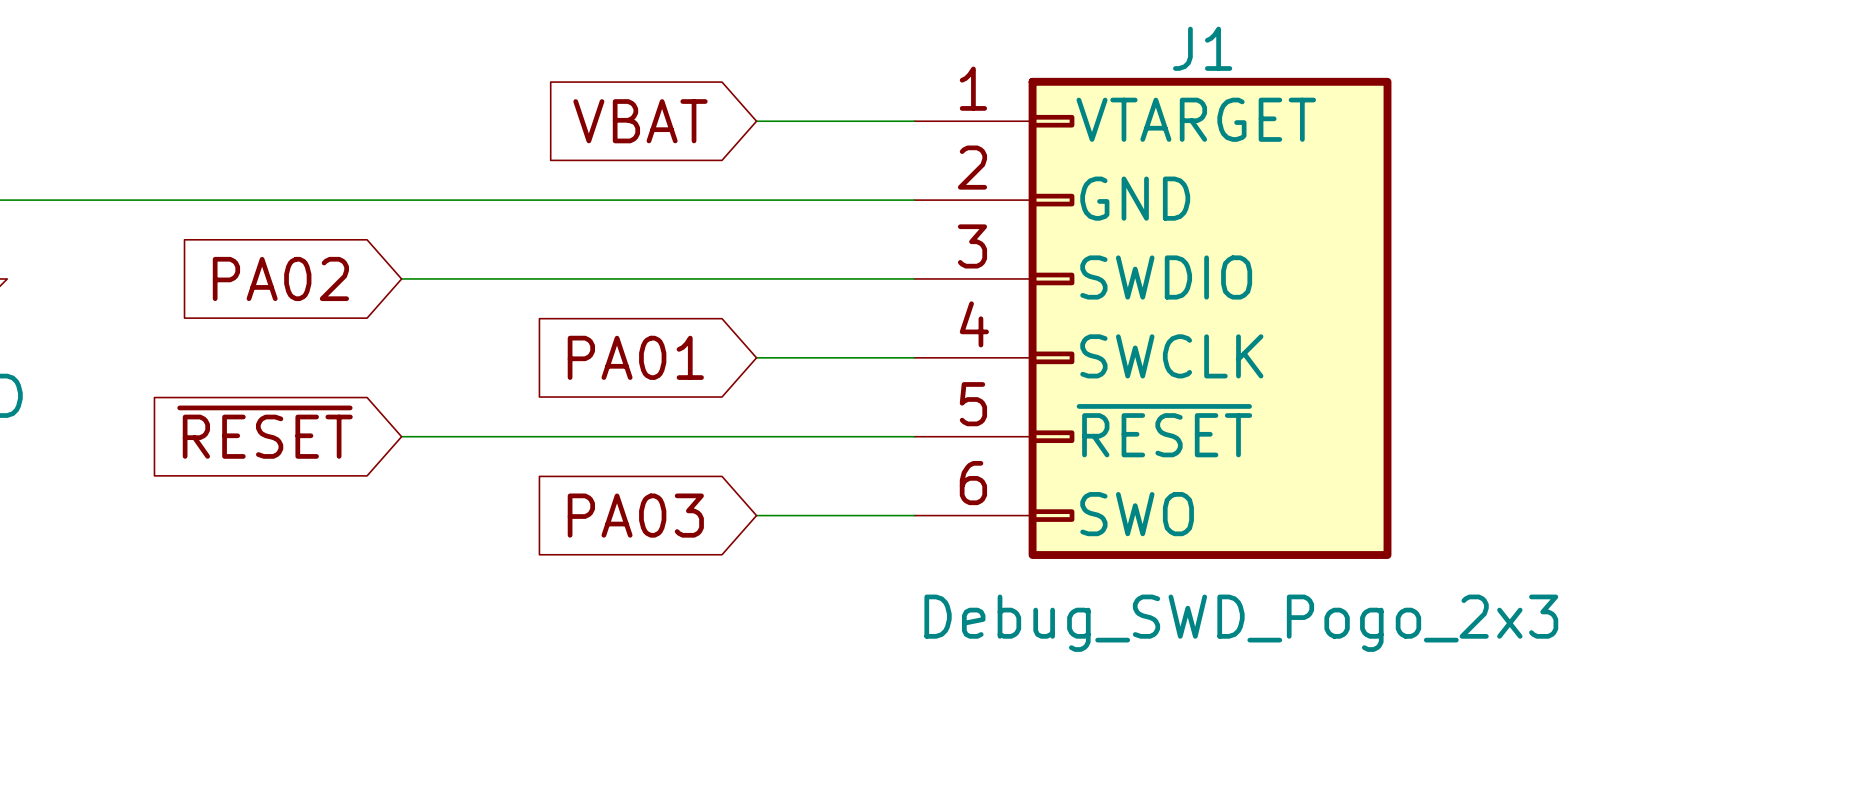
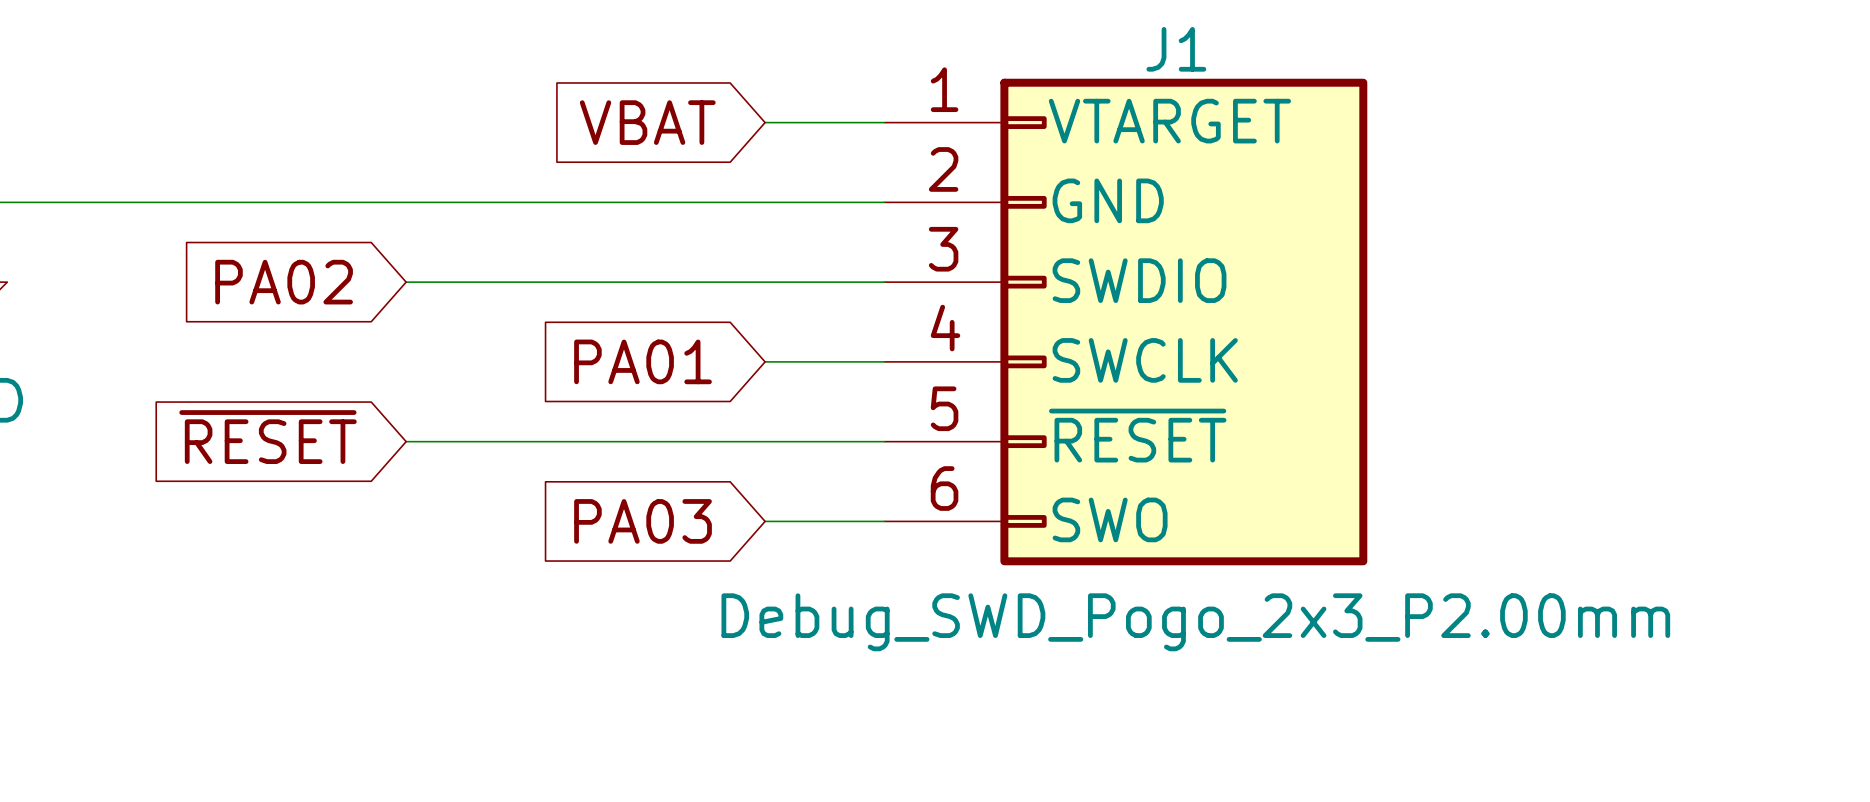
J1 position: (1152, 318) -> (1126, 322)
J1 value: Debug_SWD_Pogo_2x3 (1241, 623) -> Debug_SWD_Pogo_2x3_P2.00mm (1195, 622)

